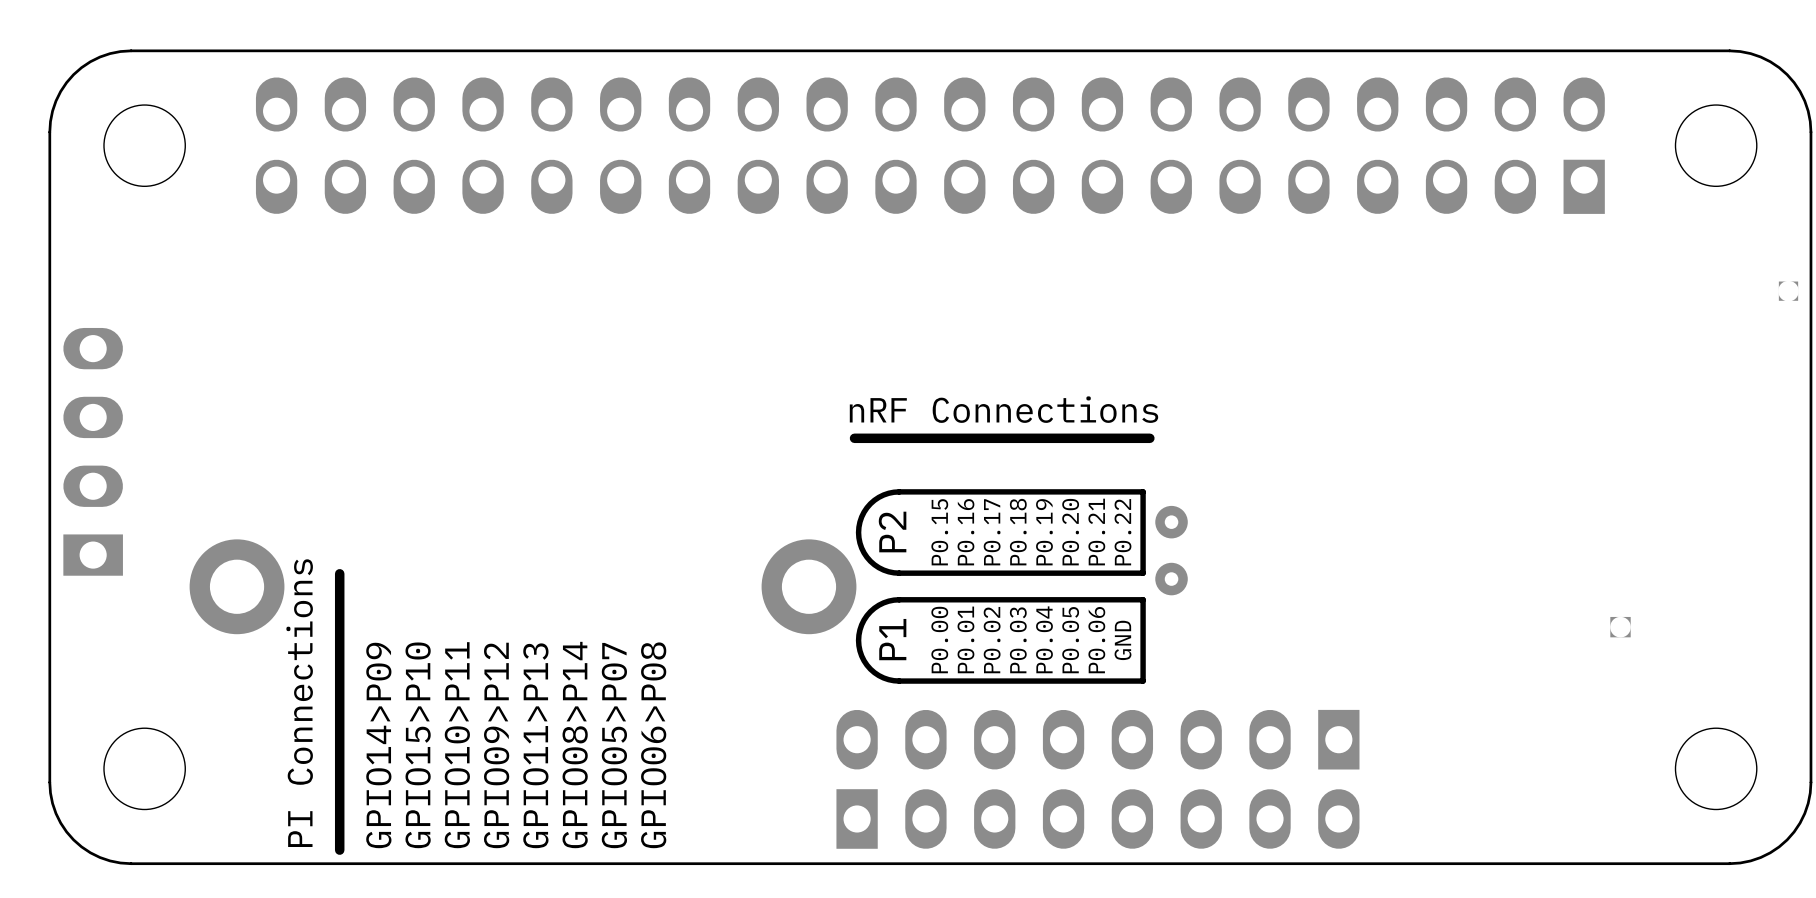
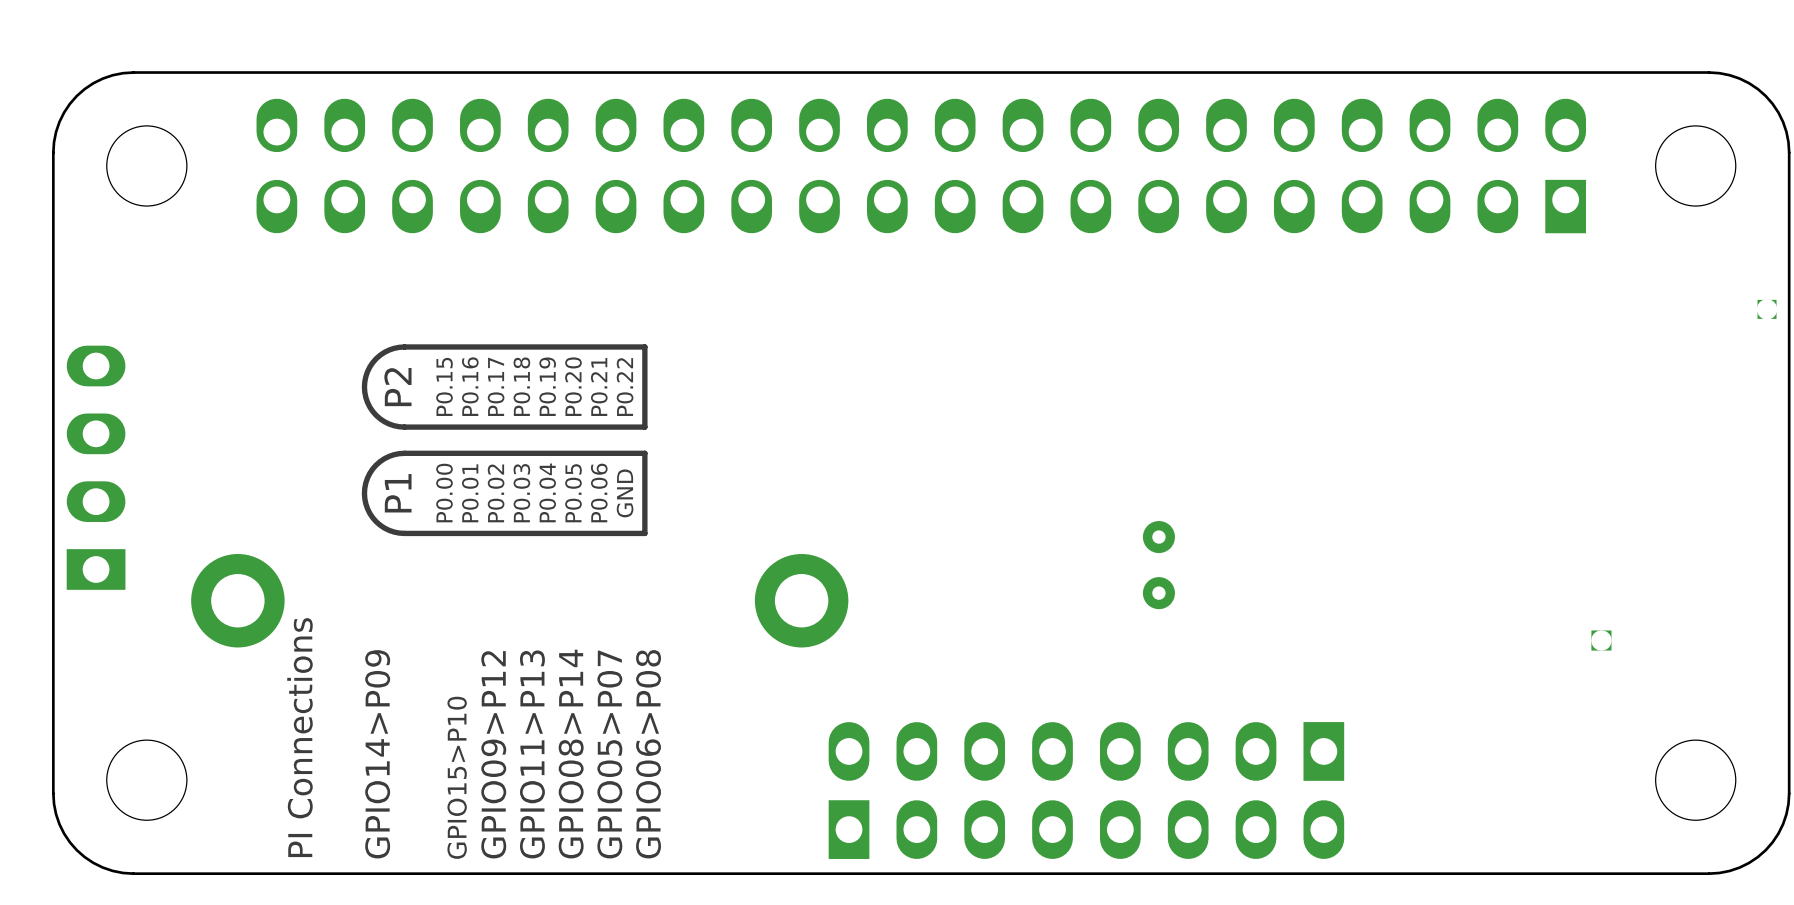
text: nRF Connections (1003, 409) -> none
line: (1149, 438) (854, 438) -> none
line: (1143, 491) (1143, 573) (893, 572) (883, 570) (870, 561) (861, 548) (858, 537) (859, 522) (866, 507) (878, 497) (893, 492) (1143, 491) -> (644, 346) (644, 427) (399, 426) (389, 424) (376, 415) (367, 402) (364, 392) (365, 376) (372, 362) (384, 352) (399, 347) (644, 346)
text position: P2 (892, 532) -> P2 (397, 387)
text position: P0.15 (939, 532) -> P0.15 (444, 386)
text position: P0.16 (965, 532) -> P0.16 (470, 386)
text position: P0.17 (992, 532) -> P0.17 (496, 386)
text position: P0.18 (1018, 532) -> P0.18 (521, 386)
text position: P0.19 (1044, 532) -> P0.19 (547, 386)
text position: P0.20 (1070, 532) -> P0.20 (573, 386)
text position: P0.21 (1096, 532) -> P0.21 (599, 386)
text position: P0.22 (1122, 532) -> P0.22 (625, 387)
line: (339, 573) (339, 850) -> none
line: (1143, 599) (1143, 681) (893, 680) (883, 677) (870, 669) (861, 655) (858, 645) (859, 629) (866, 615) (878, 605) (893, 600) (1143, 599) -> (644, 453) (644, 533) (399, 533) (389, 530) (376, 521) (367, 508) (364, 498) (365, 483) (372, 468) (384, 458) (399, 453) (644, 453)
text position: P1 (892, 639) -> P1 (398, 493)
text position: P0.01 (965, 639) -> P0.01 (470, 493)
text position: P0.04 (1044, 639) -> P0.04 (547, 492)
text position: P0.00 (939, 640) -> P0.00 (444, 493)
text position: P0.02 (992, 640) -> P0.02 (496, 493)
text position: P0.03 (1018, 640) -> P0.03 (521, 493)
text position: P0.05 (1070, 640) -> P0.05 (573, 493)
text position: P0.06 (1096, 640) -> P0.06 (599, 492)
text position: GND (1122, 640) -> GND (625, 493)
text: GPIO15>P10 (418, 745) -> none
text: GPIO10>P11 (457, 745) -> GPIO15>P10 (457, 777)

